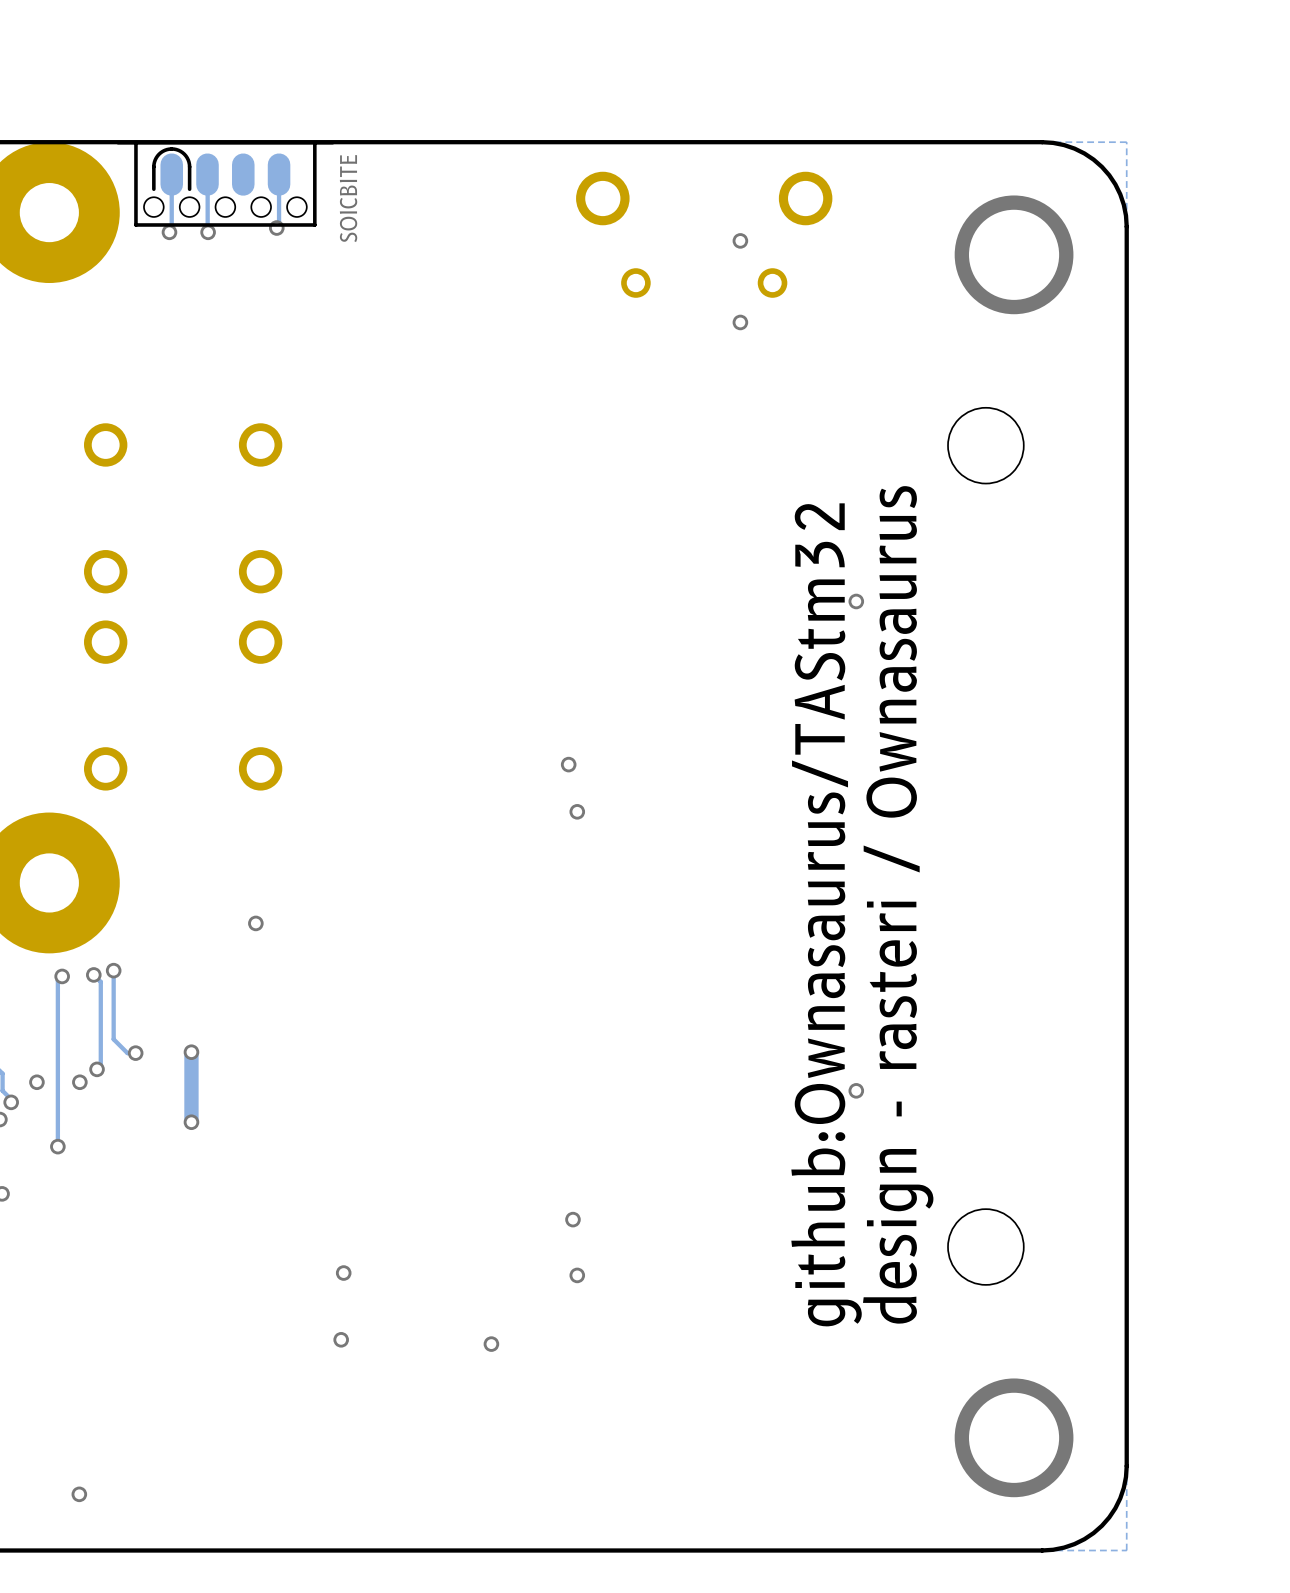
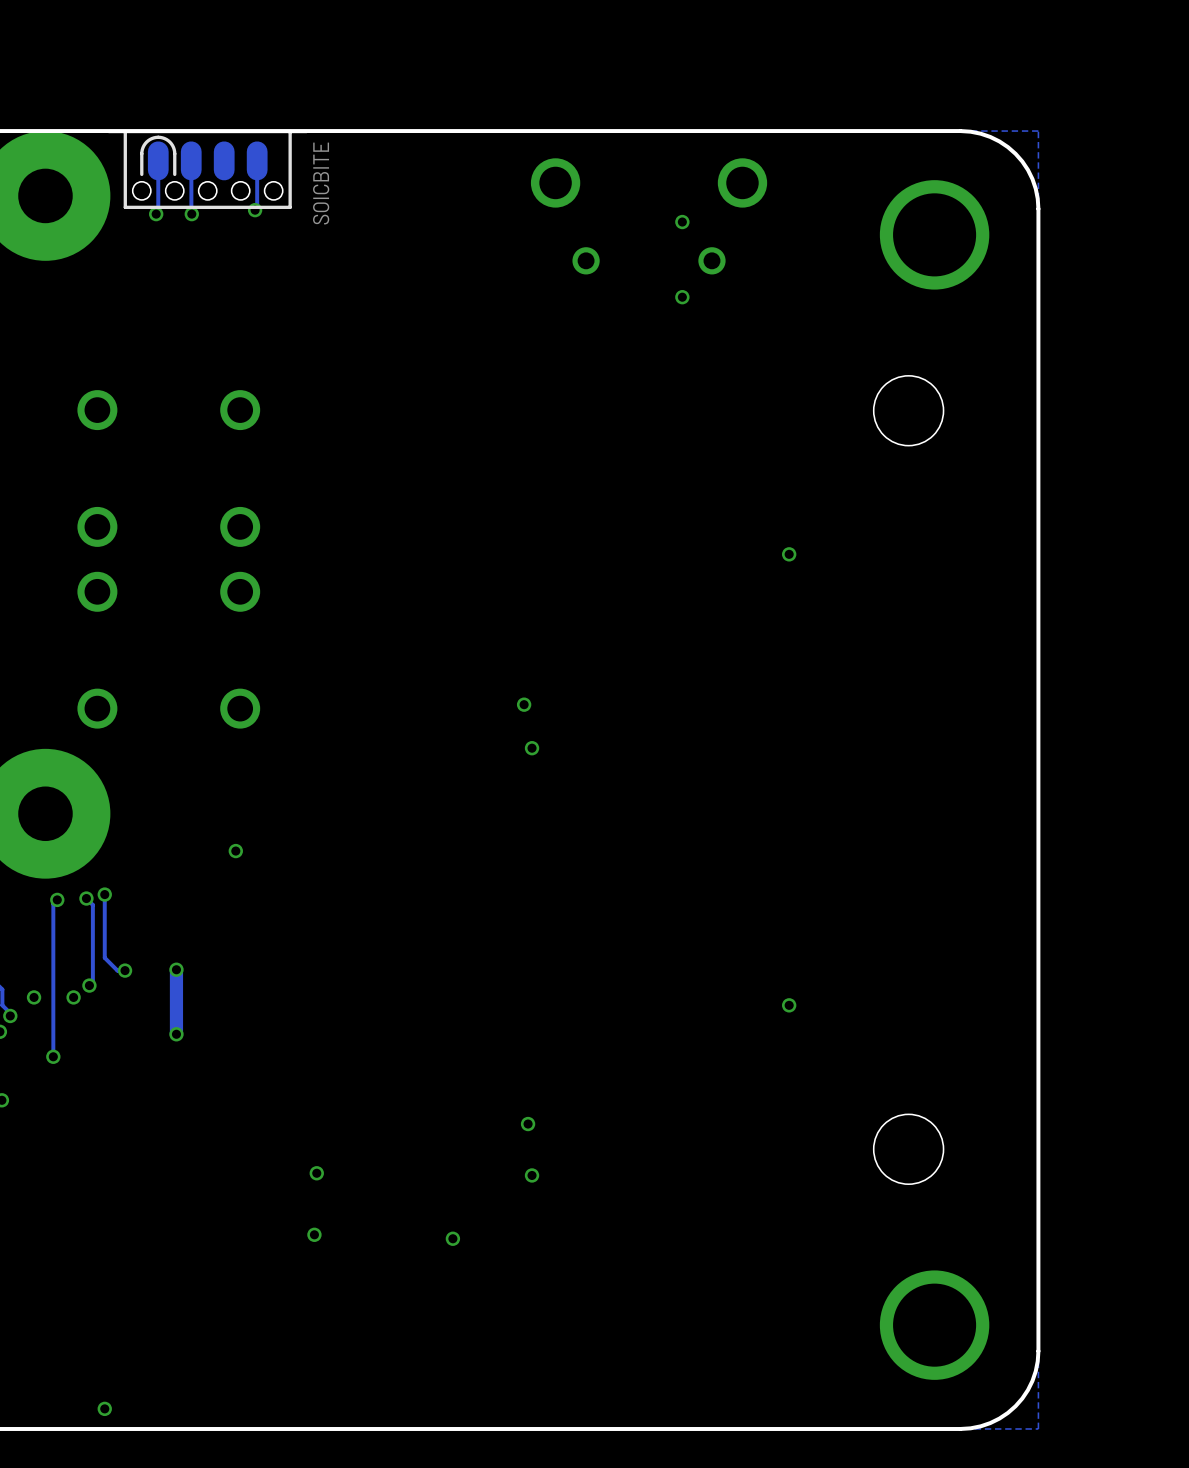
text: design - rasteri / Ownasaurus (898, 904) -> none
text: github:Ownasaurus/TAStm32 (826, 914) -> none
via position: (79, 1494) -> (104, 1408)

